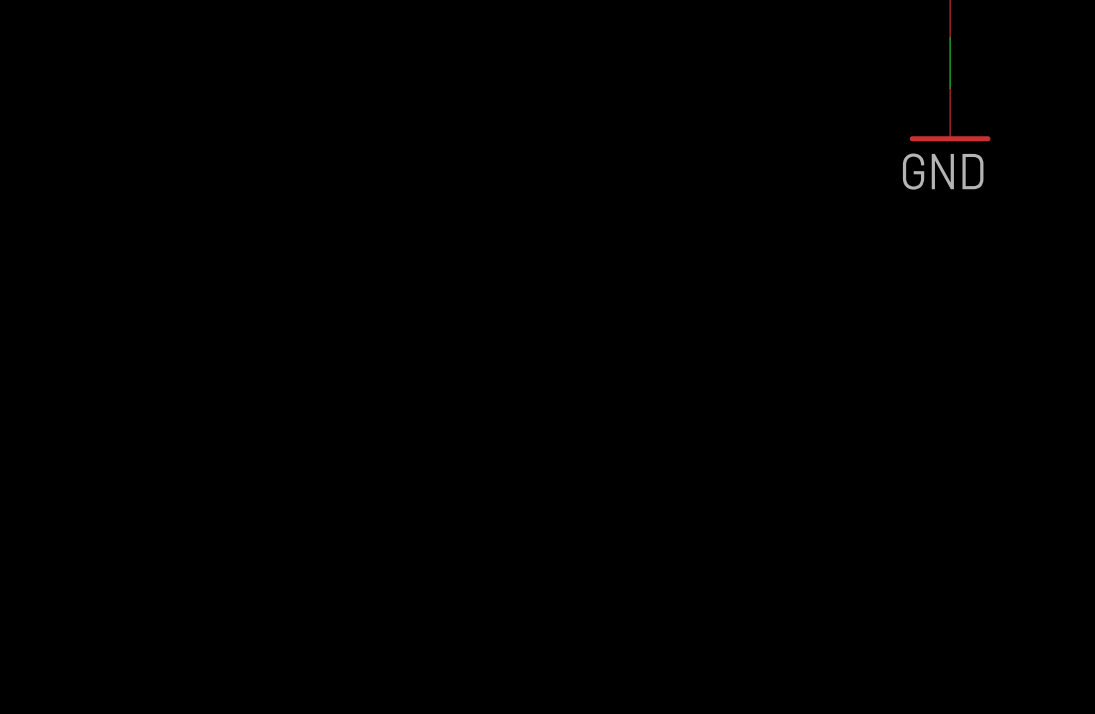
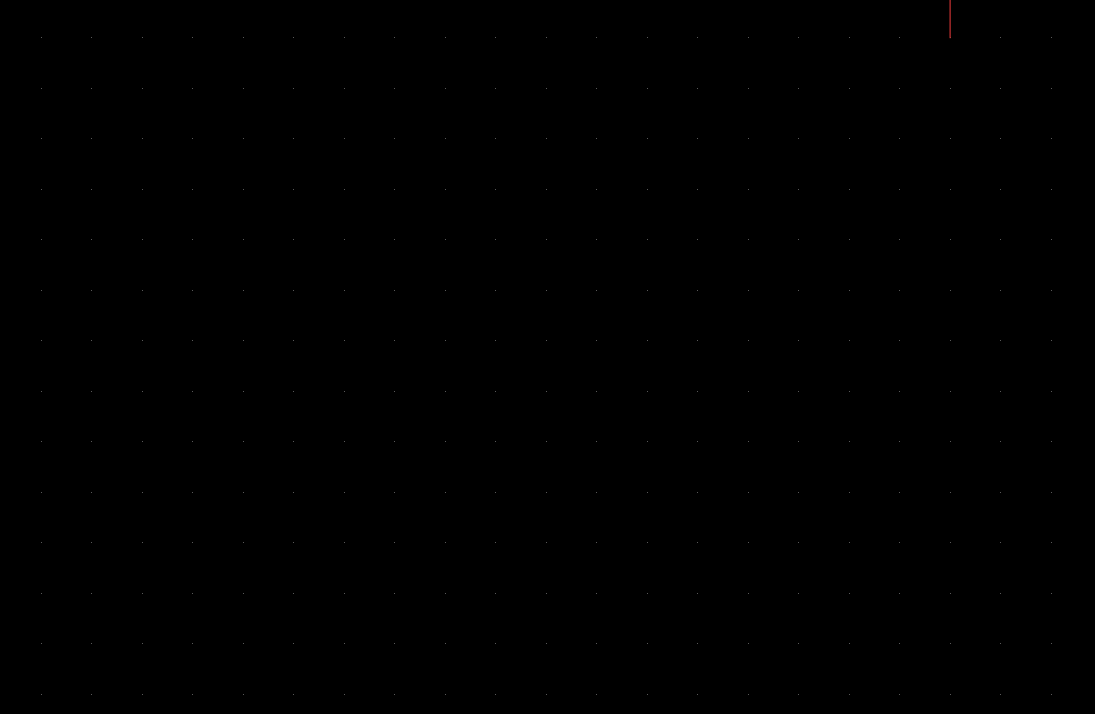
wire: (950, 37) (950, 88) -> none
power symbol: GND (950, 114) -> none

